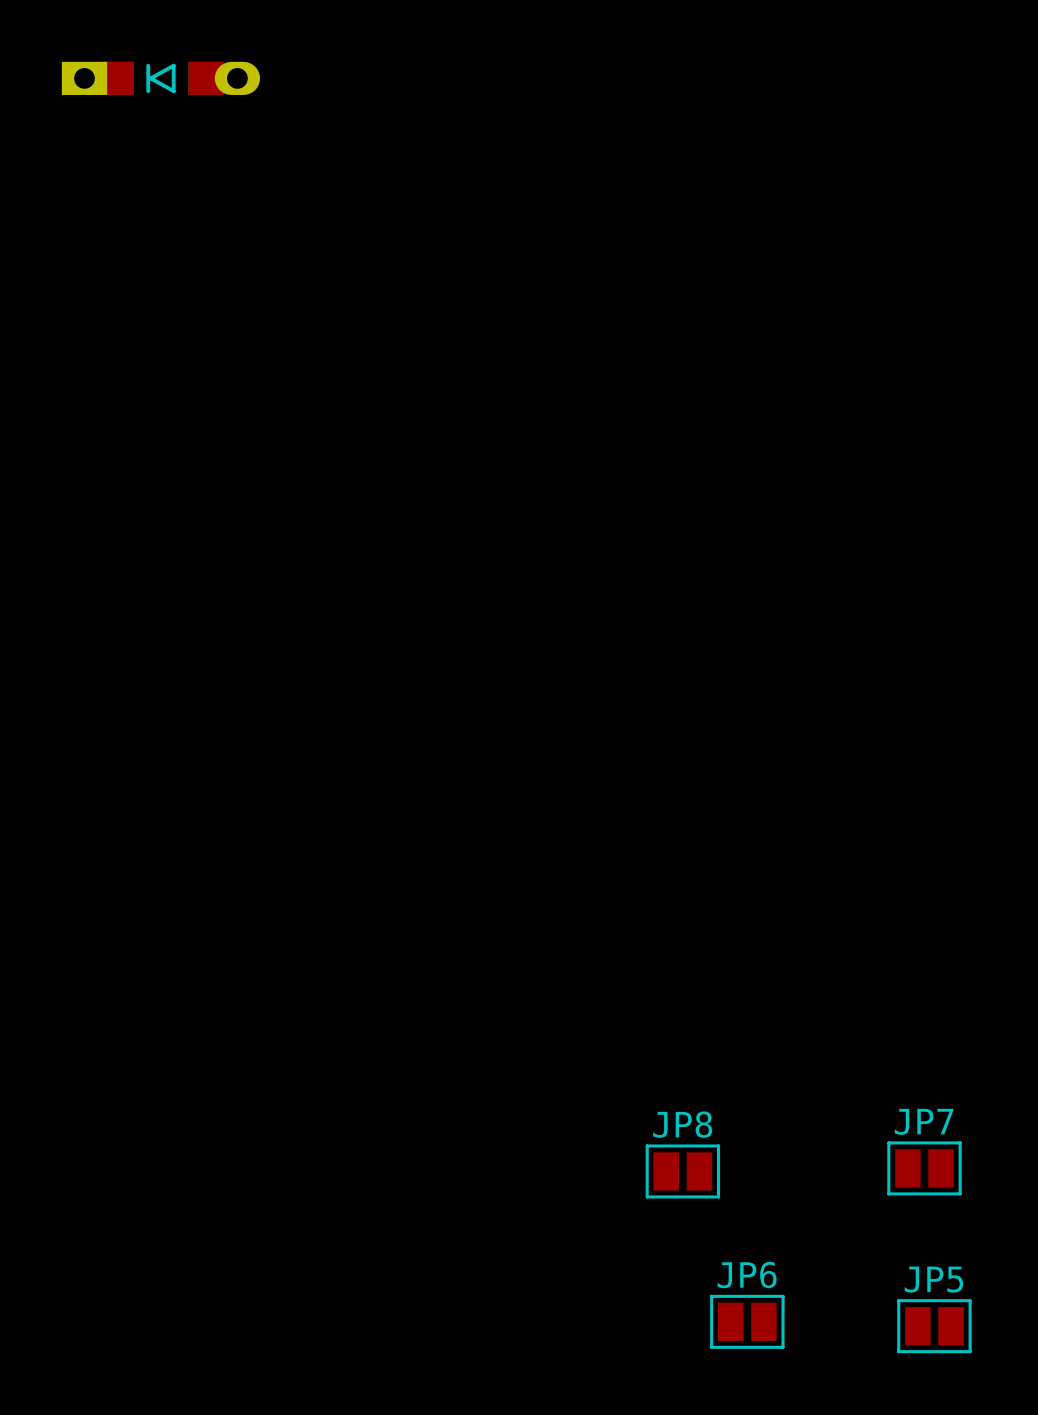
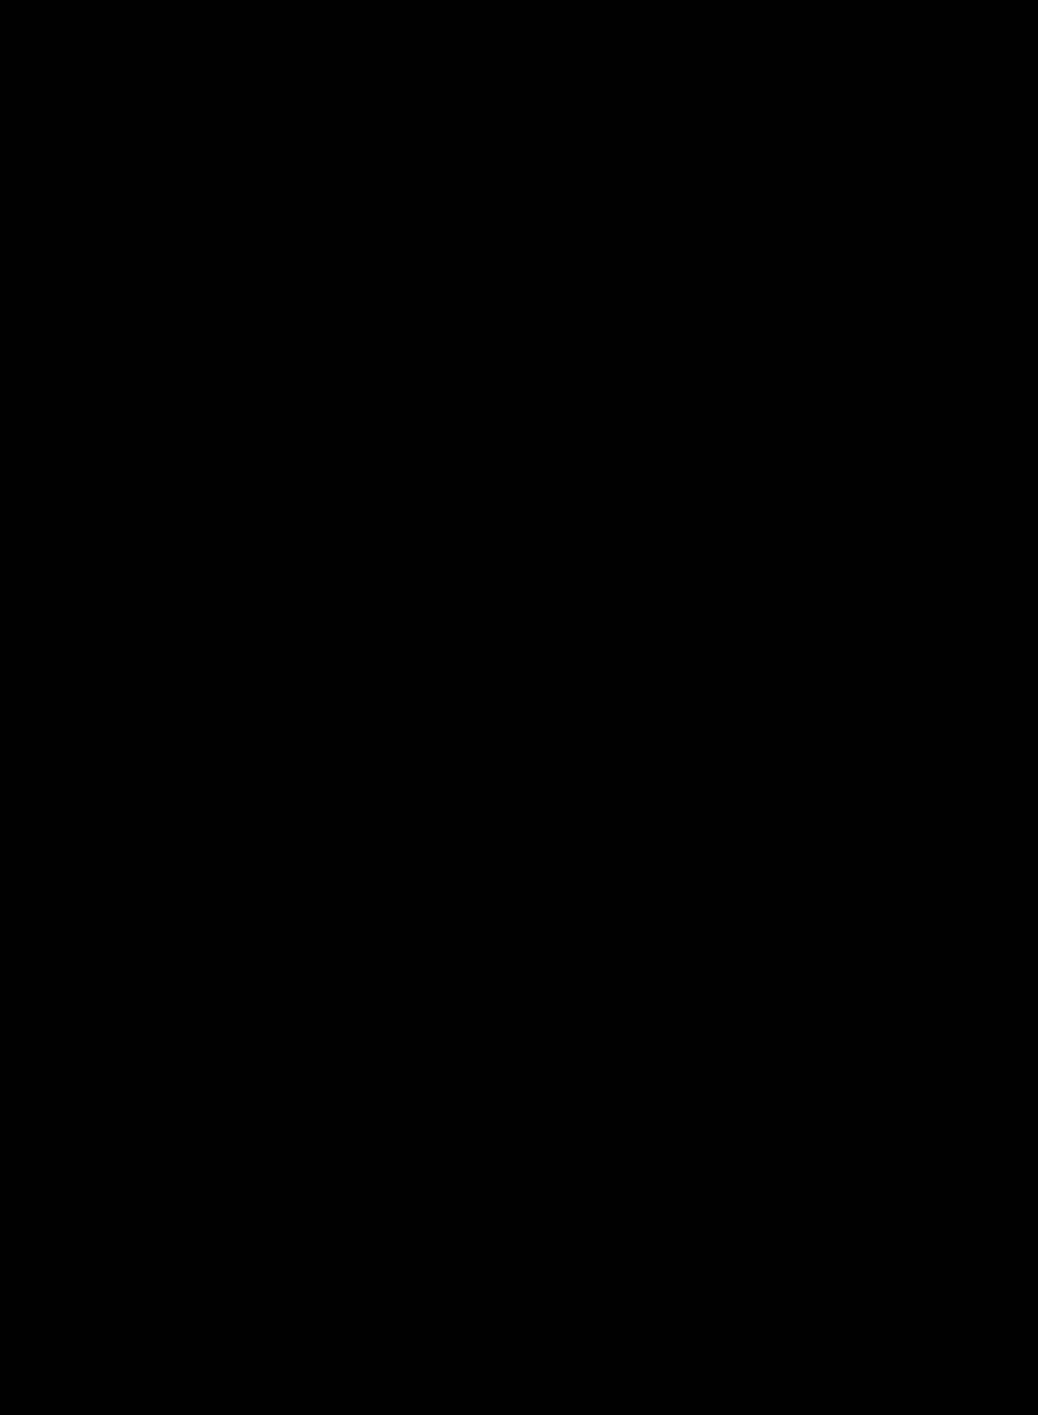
part: (160, 78) -> none
JP7: (924, 1168) -> none
JP8: (682, 1171) -> none
JP6: (747, 1321) -> none
JP5: (934, 1326) -> none

